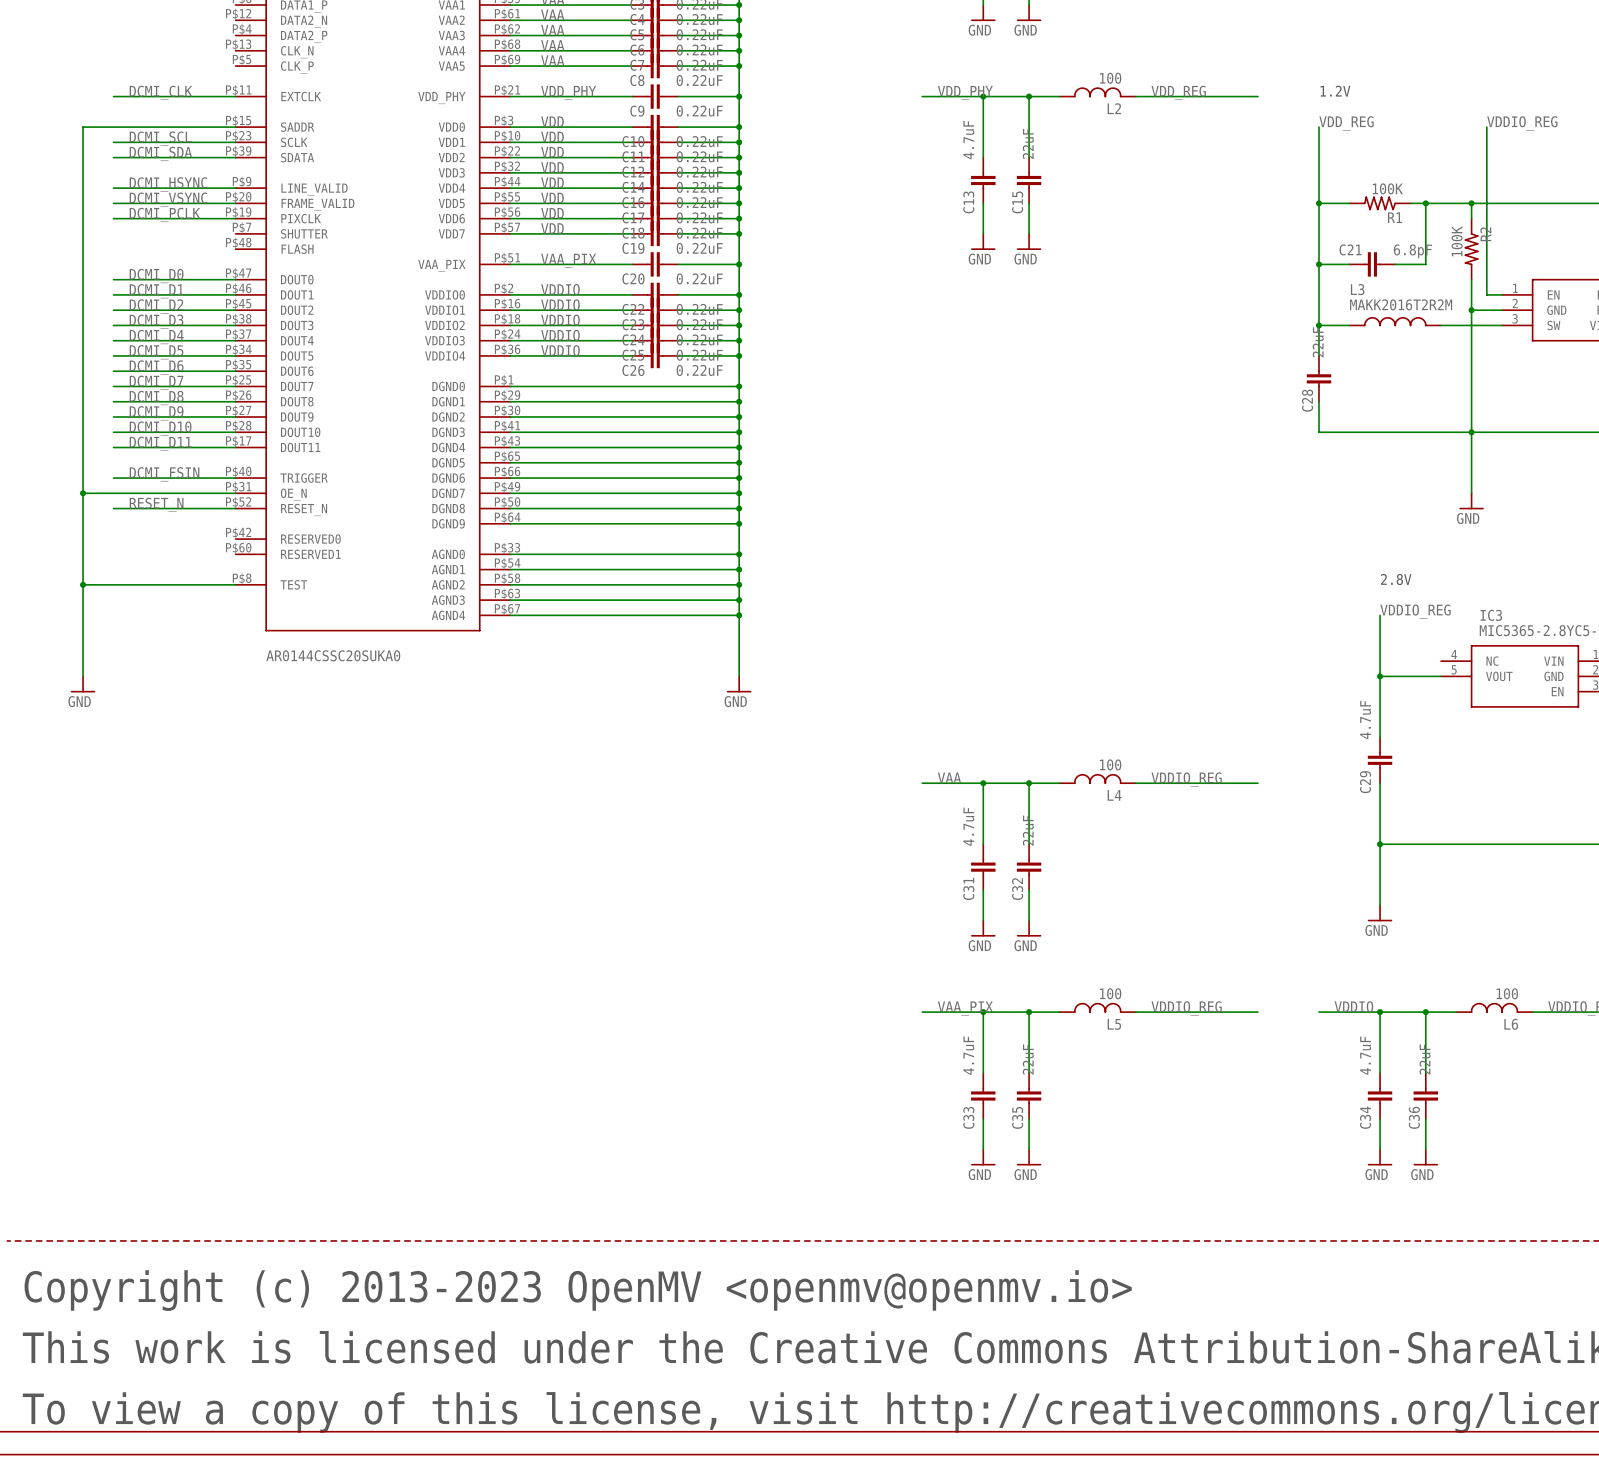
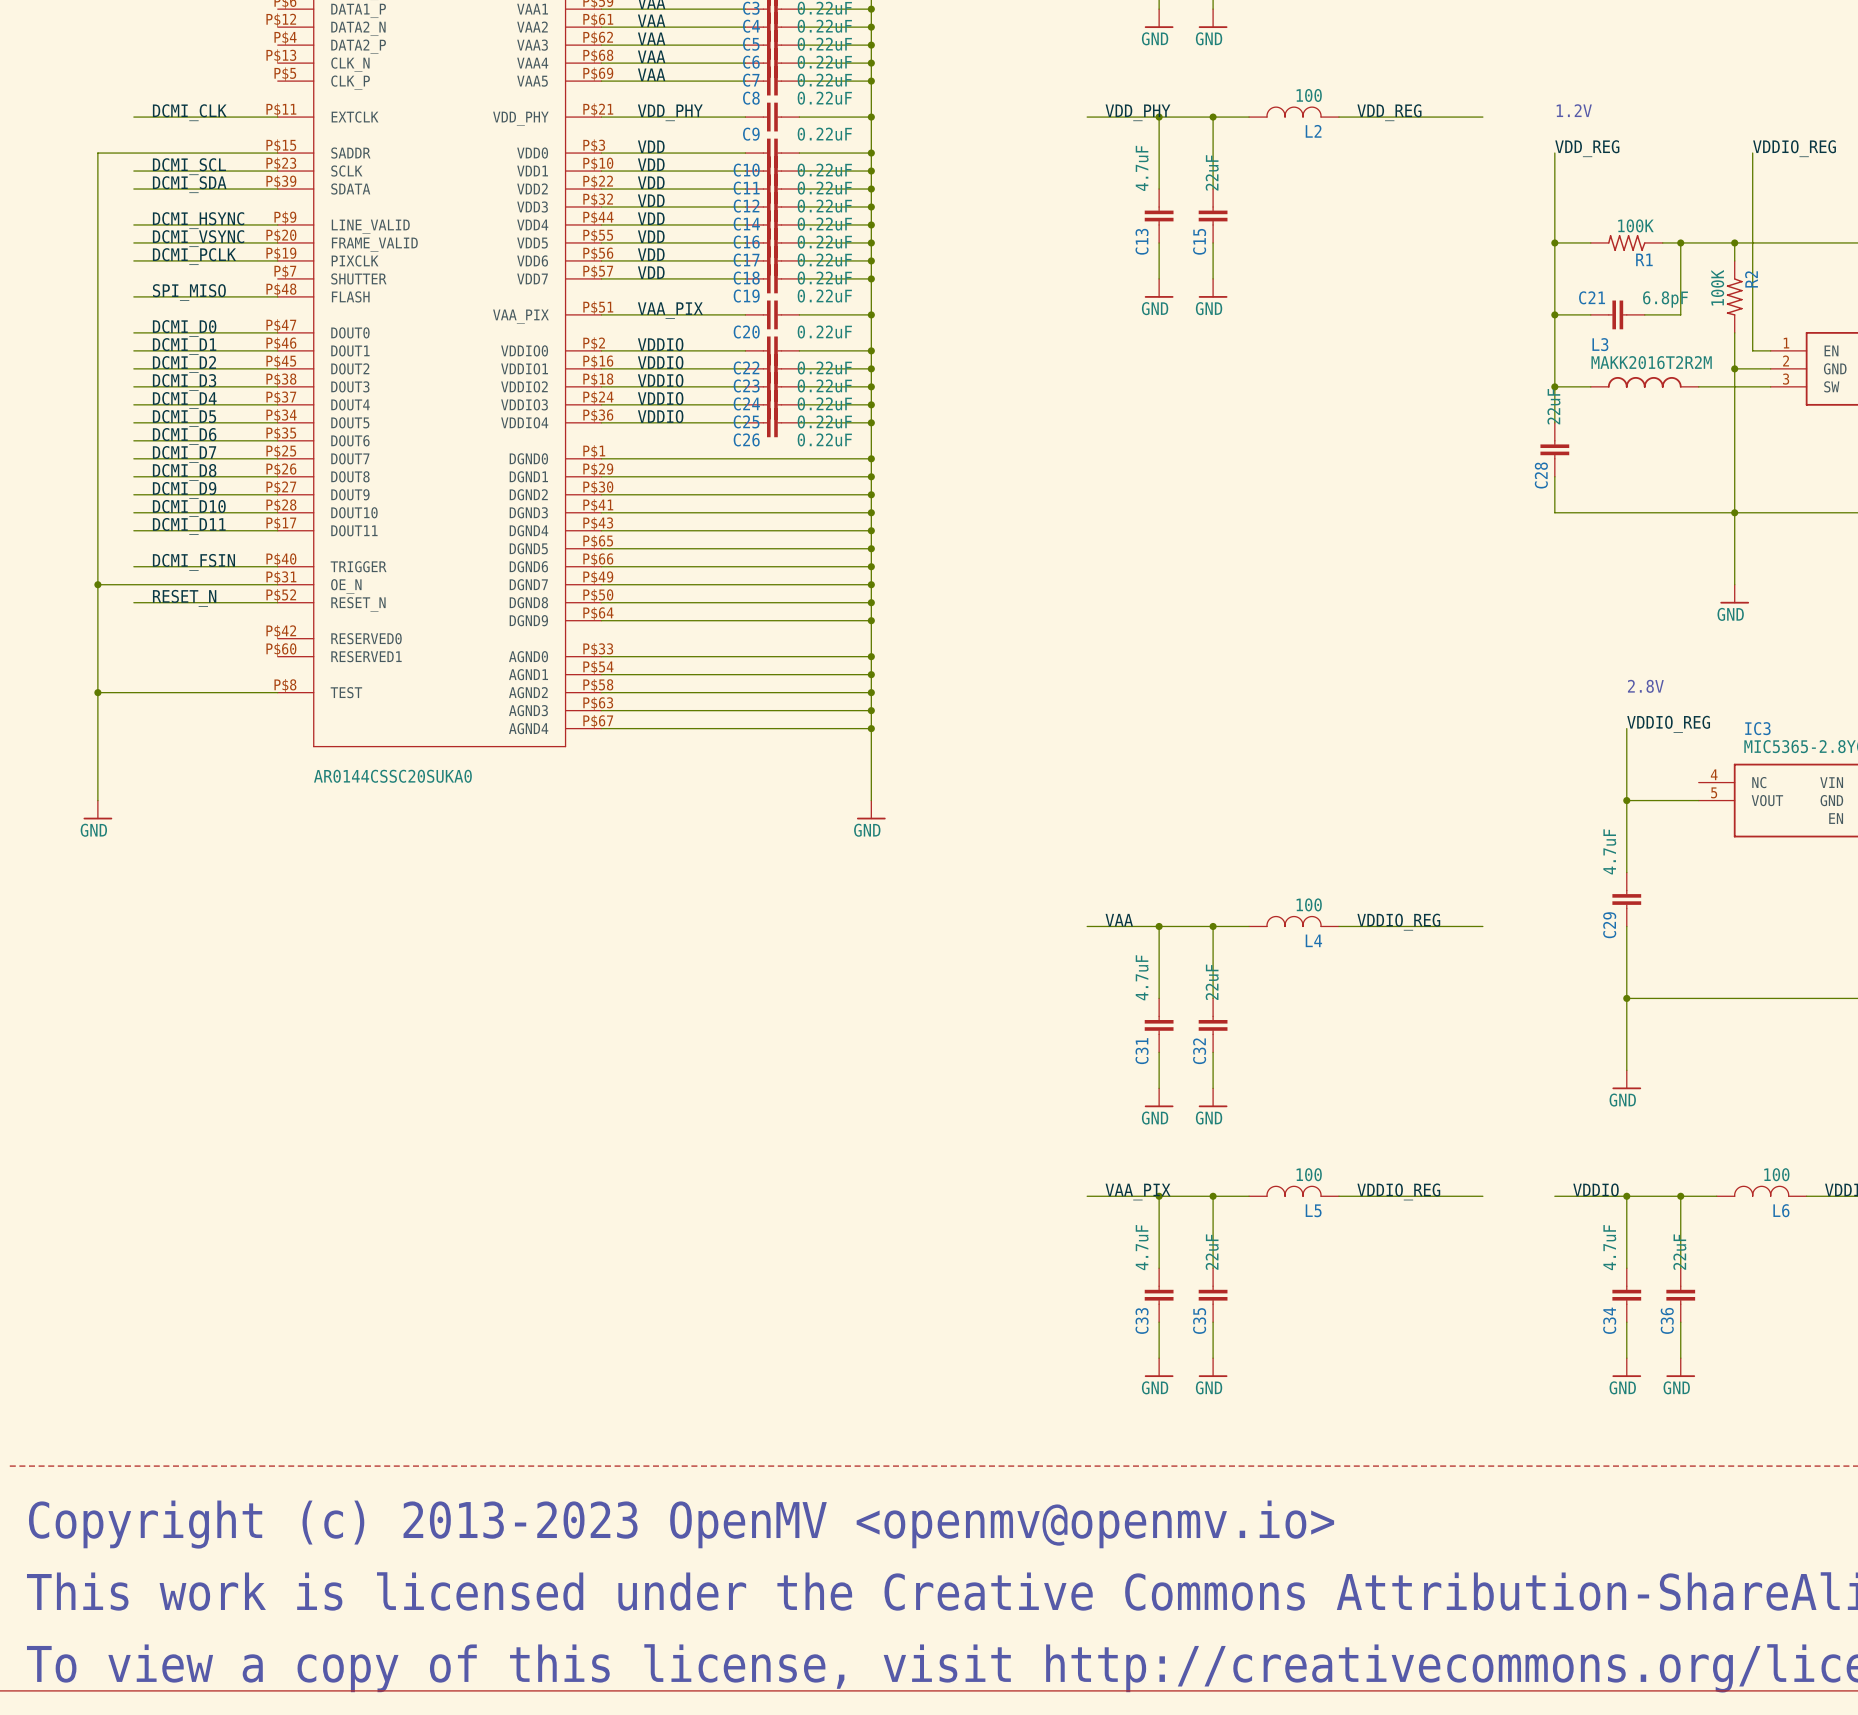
label: none -> SPI_MISO (189, 292)
wire: none -> (133, 296) (277, 296)

